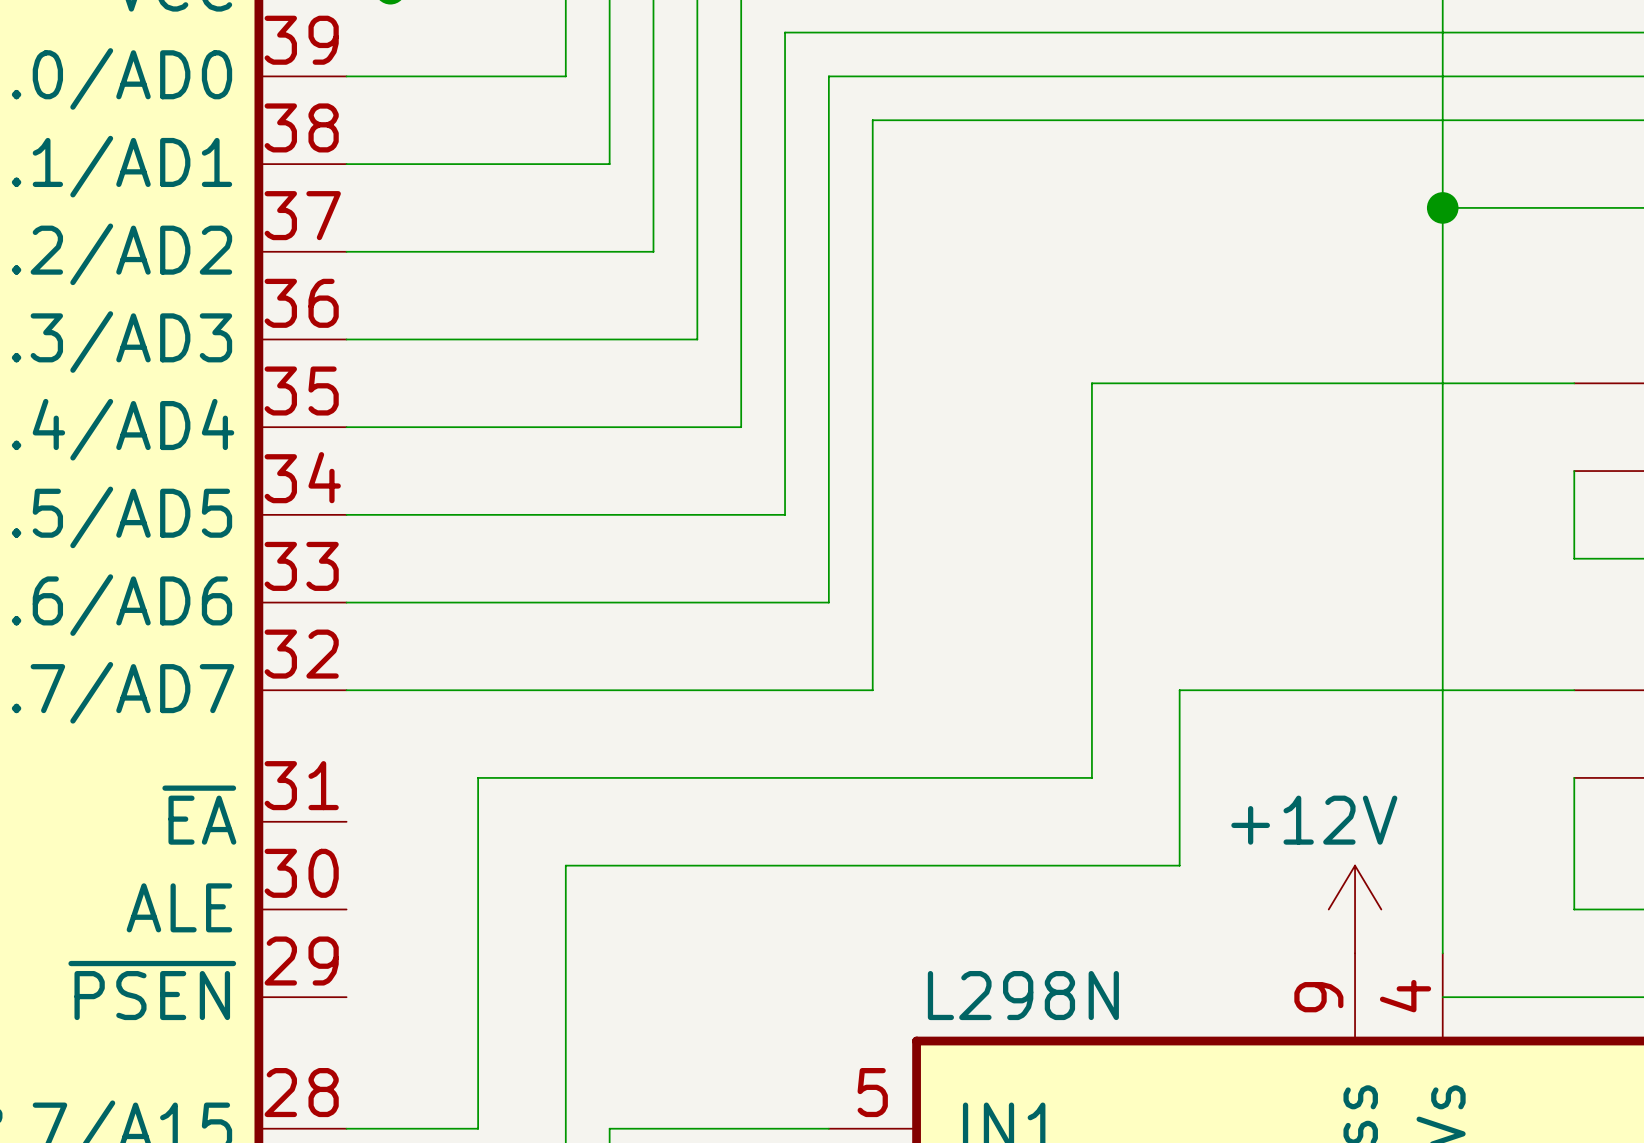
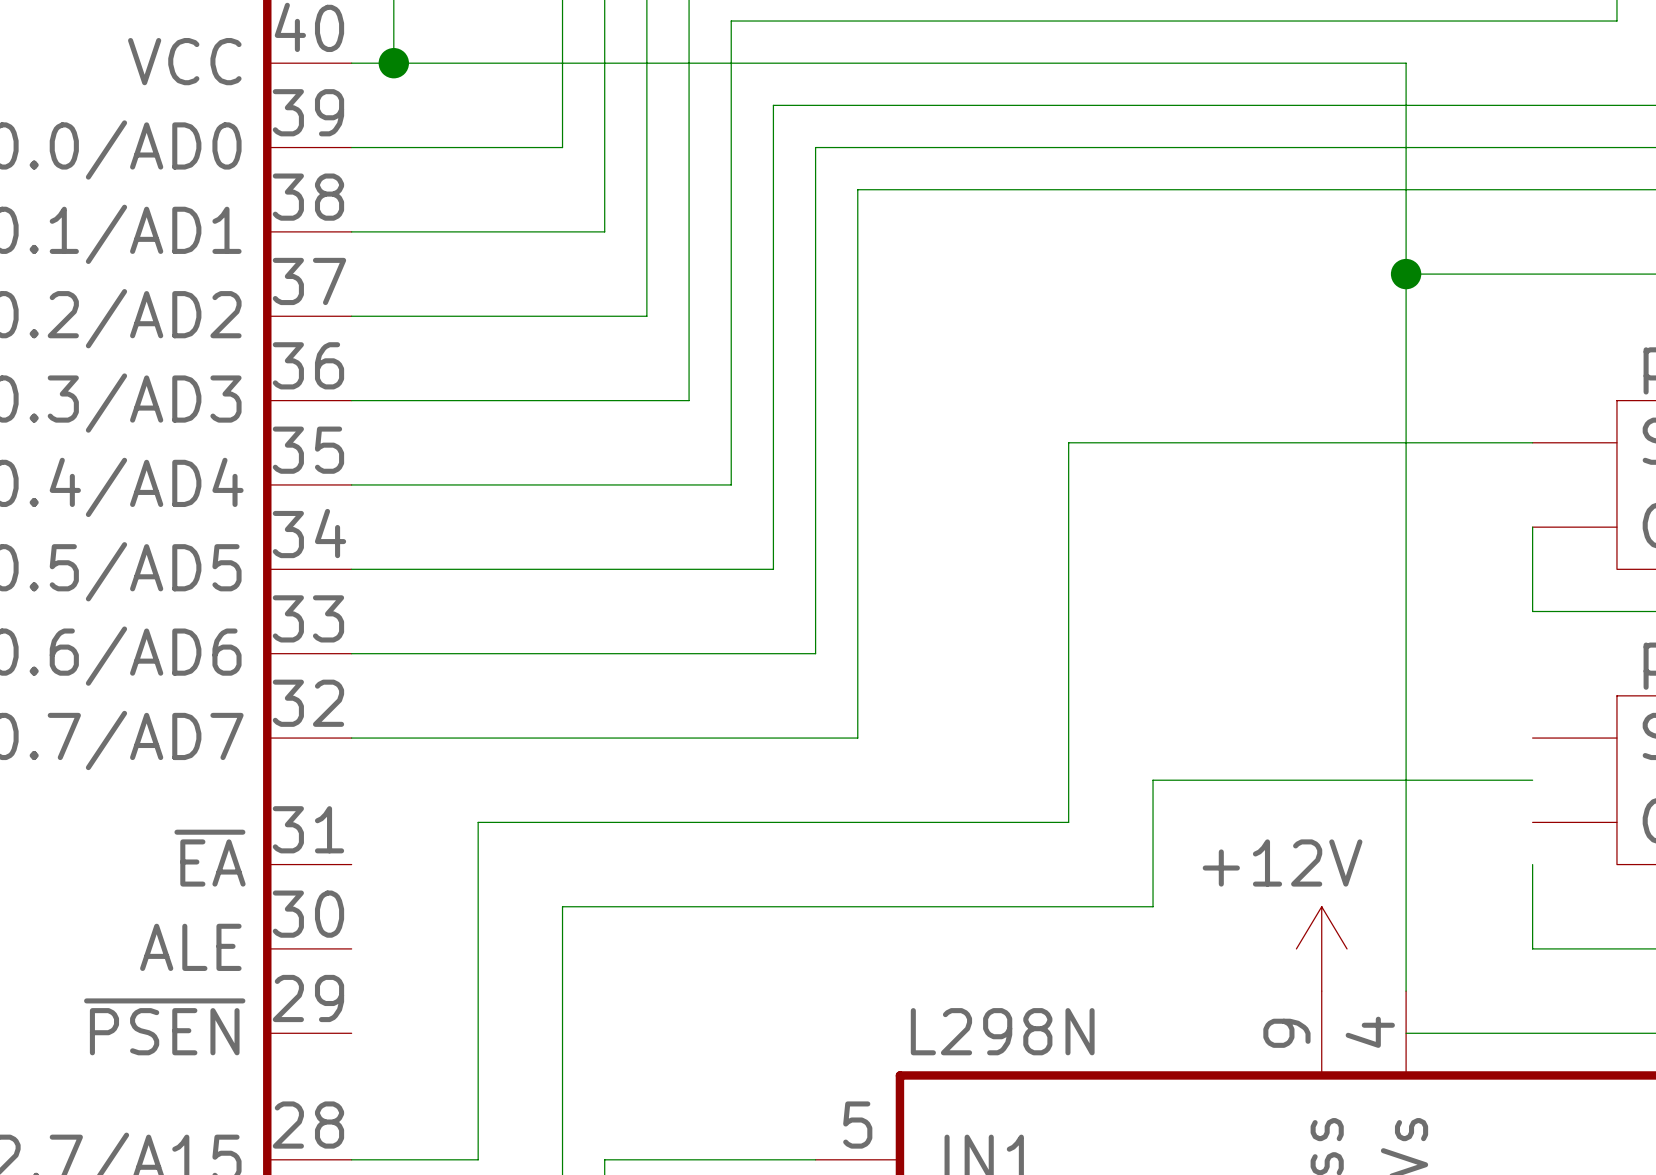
wire: (1574, 690) (1179, 690) (1179, 734) -> (1532, 780) (1153, 780)
wire: (1574, 777) (1574, 821) -> none

